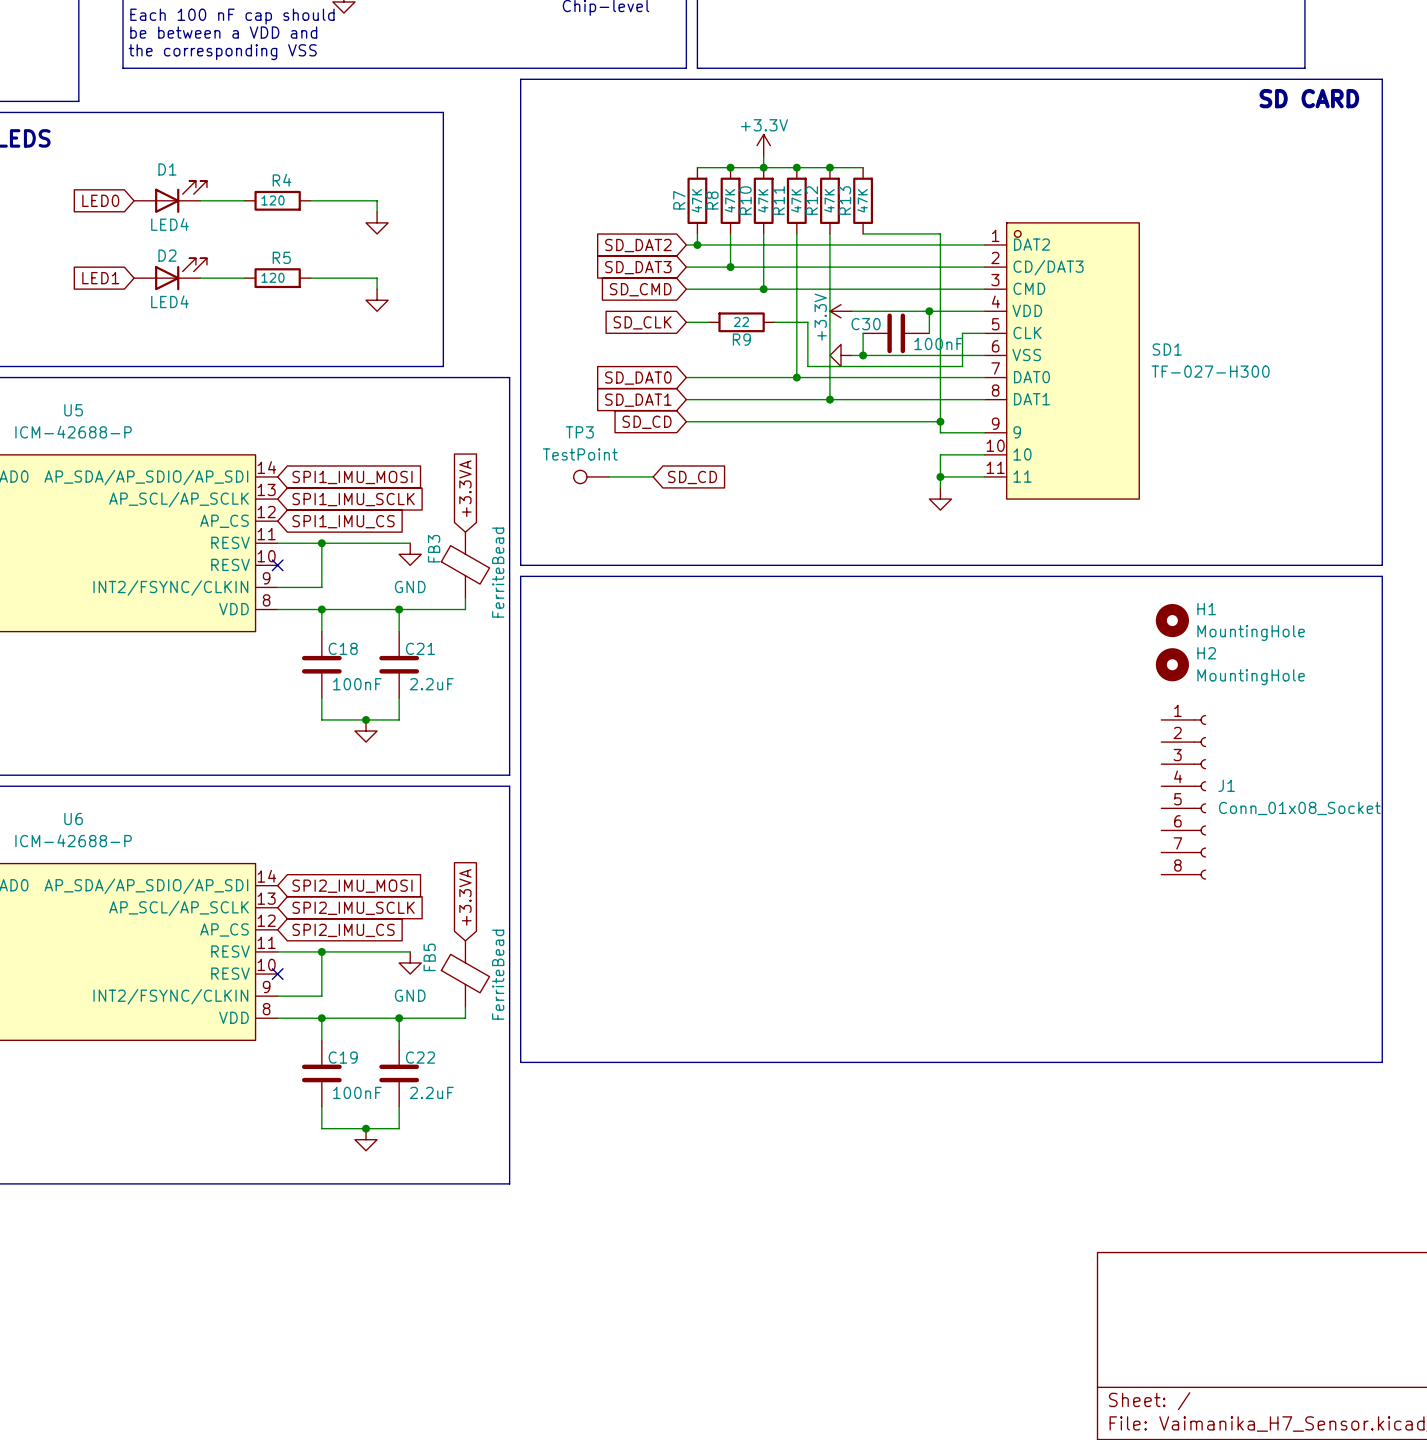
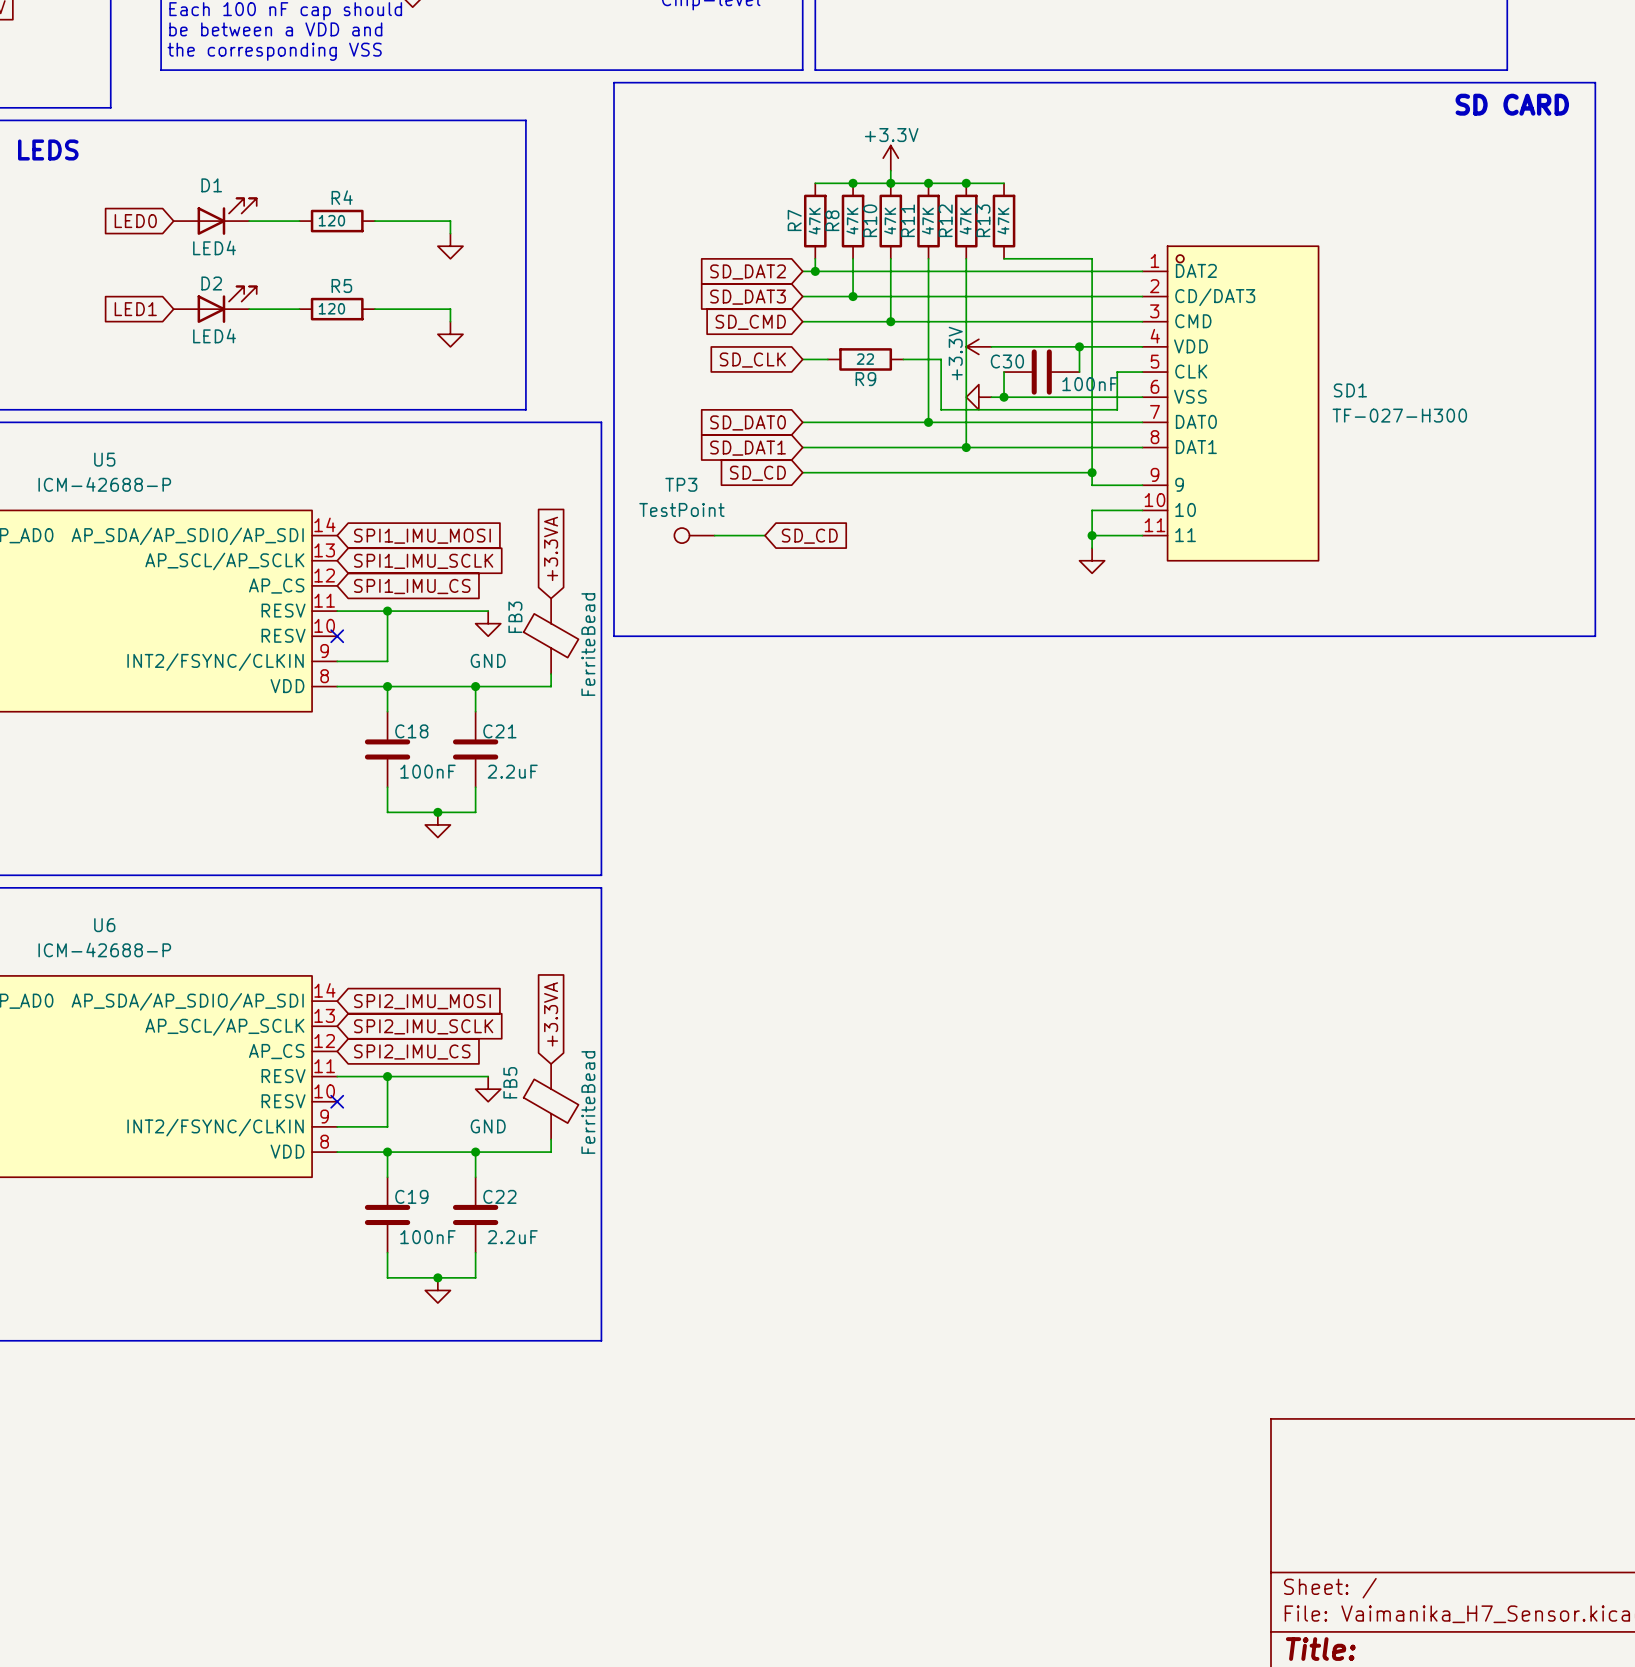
line: (520, 576) (1382, 576) (1382, 1062) (520, 1062) (520, 576) -> none
H1: MountingHole (1172, 620) -> none
H2: MountingHole (1172, 664) -> none
J1: Conn_01x08_Socket (1183, 797) -> none

